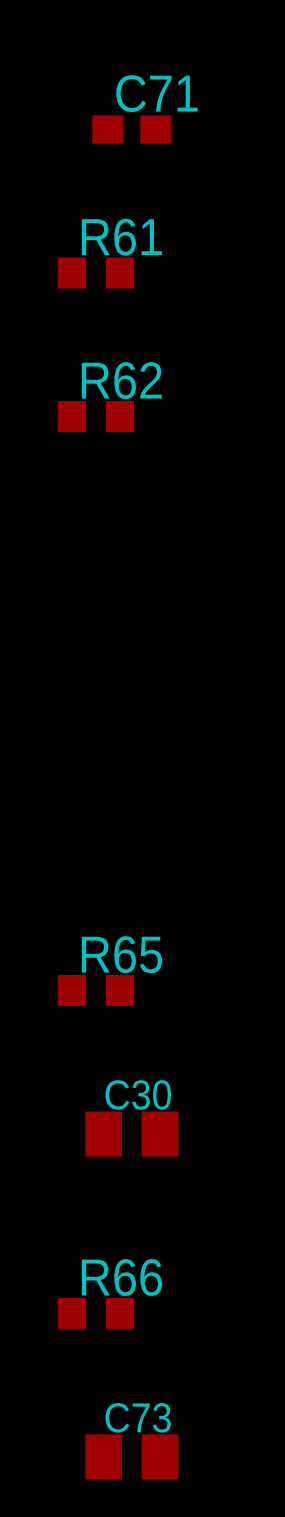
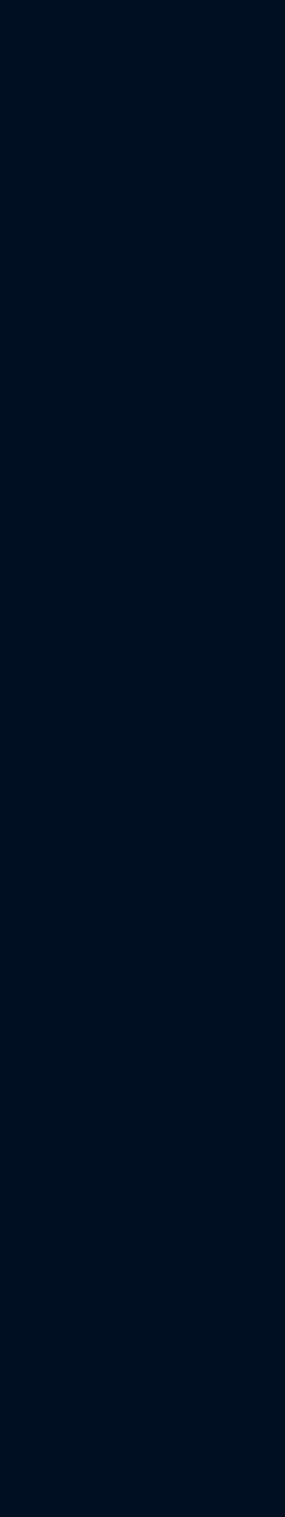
C71: (131, 129) -> none
R61: (95, 272) -> none
R62: (95, 416) -> none
R65: (95, 990) -> none
C30: (131, 1134) -> none
R66: (95, 1313) -> none
C73: (131, 1456) -> none

